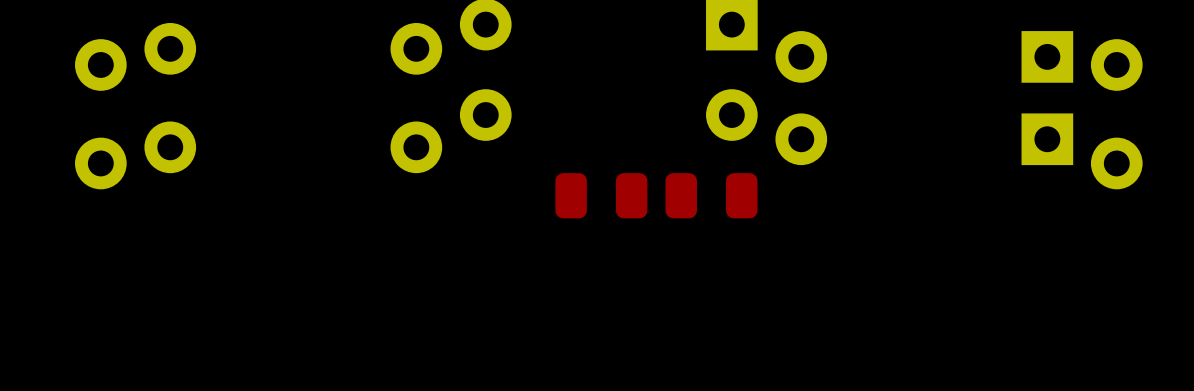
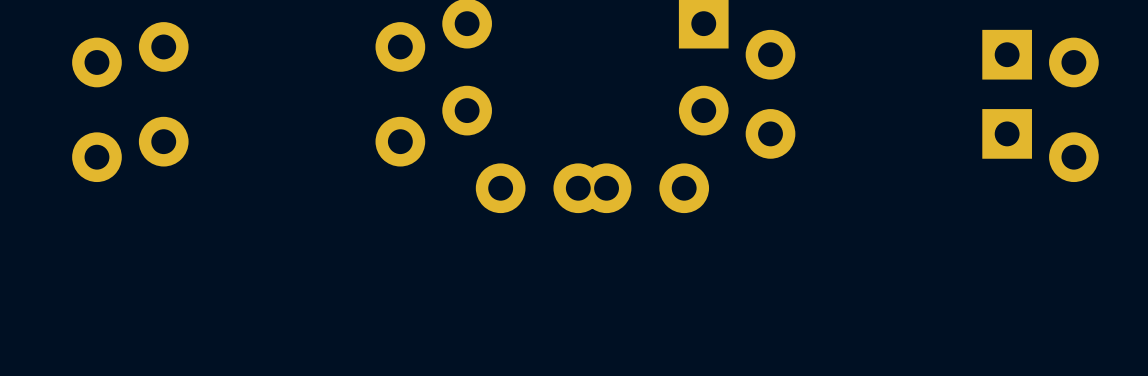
part: none -> (539, 188)
part: (601, 195) -> none
part: none -> (645, 188)
part: (711, 195) -> none

